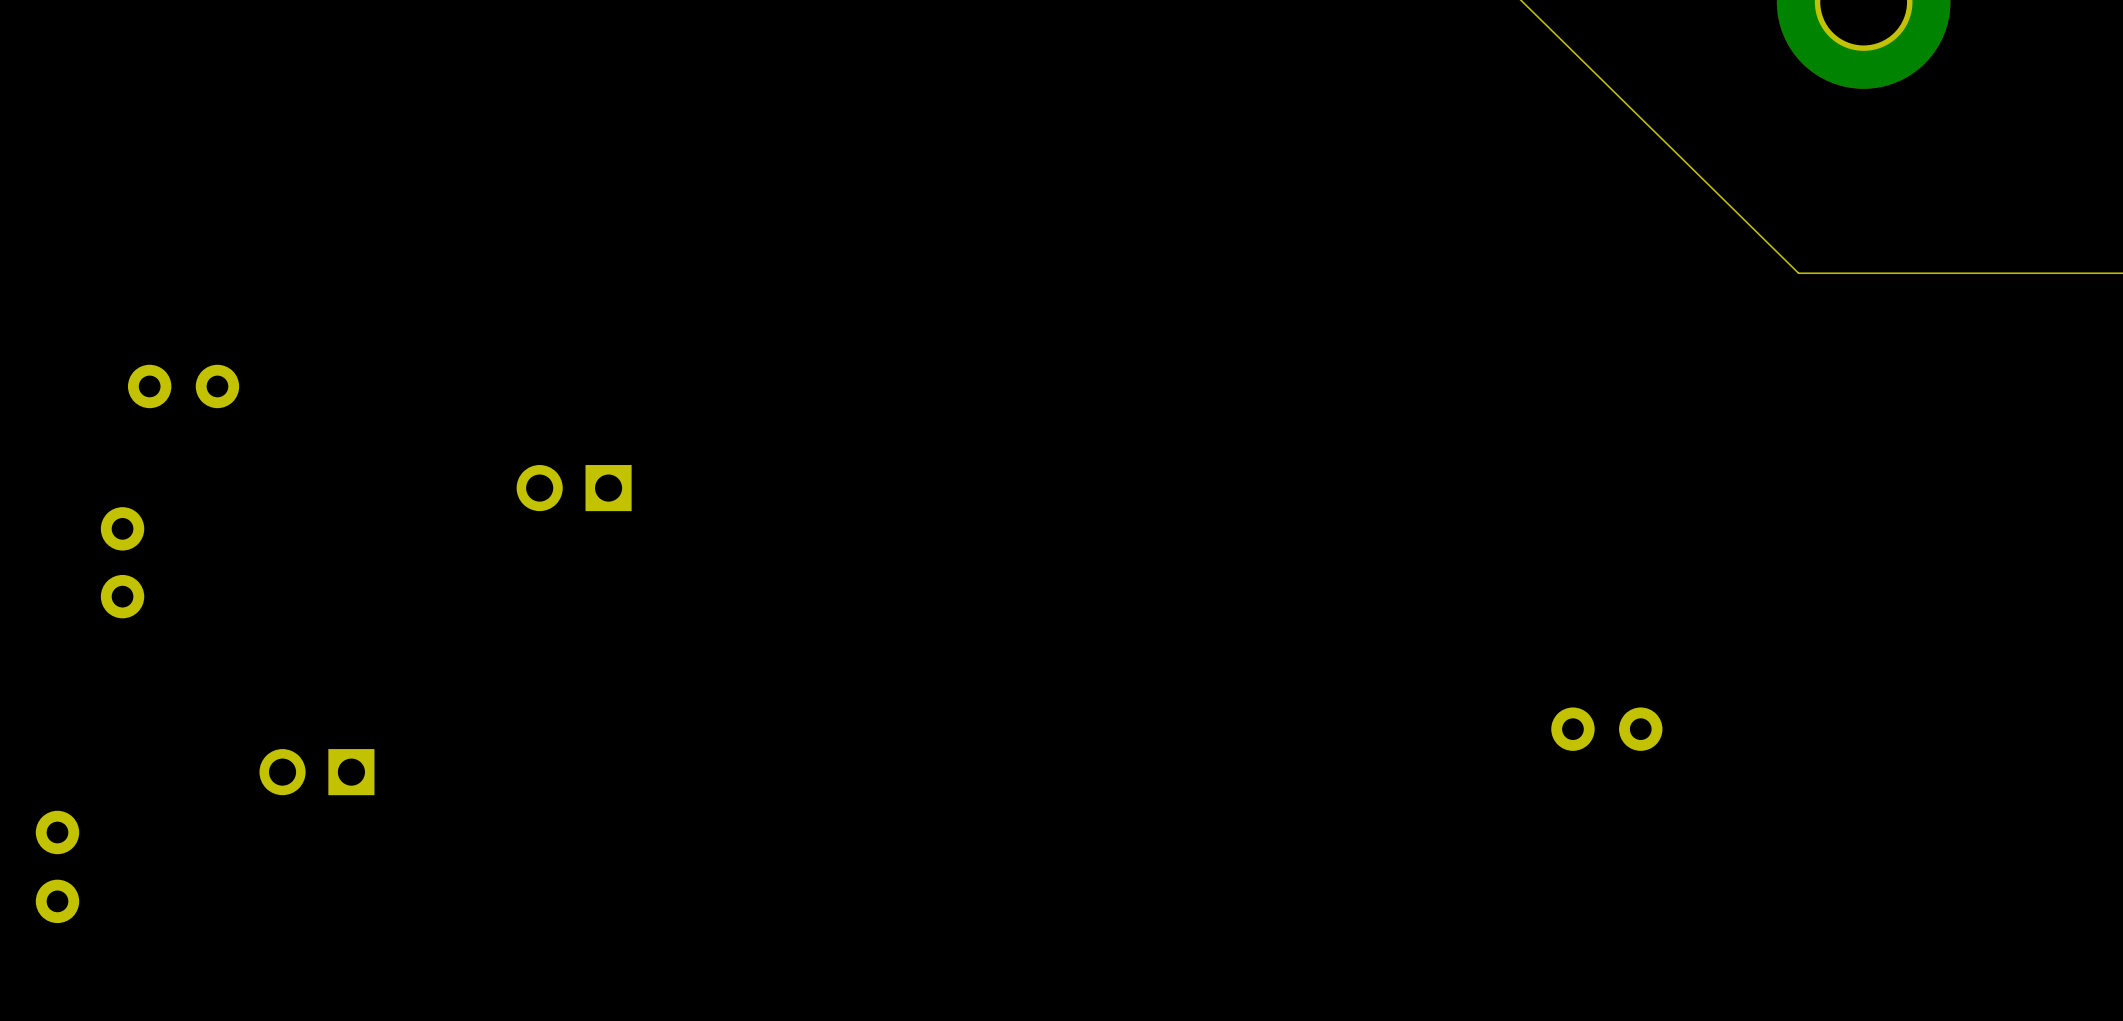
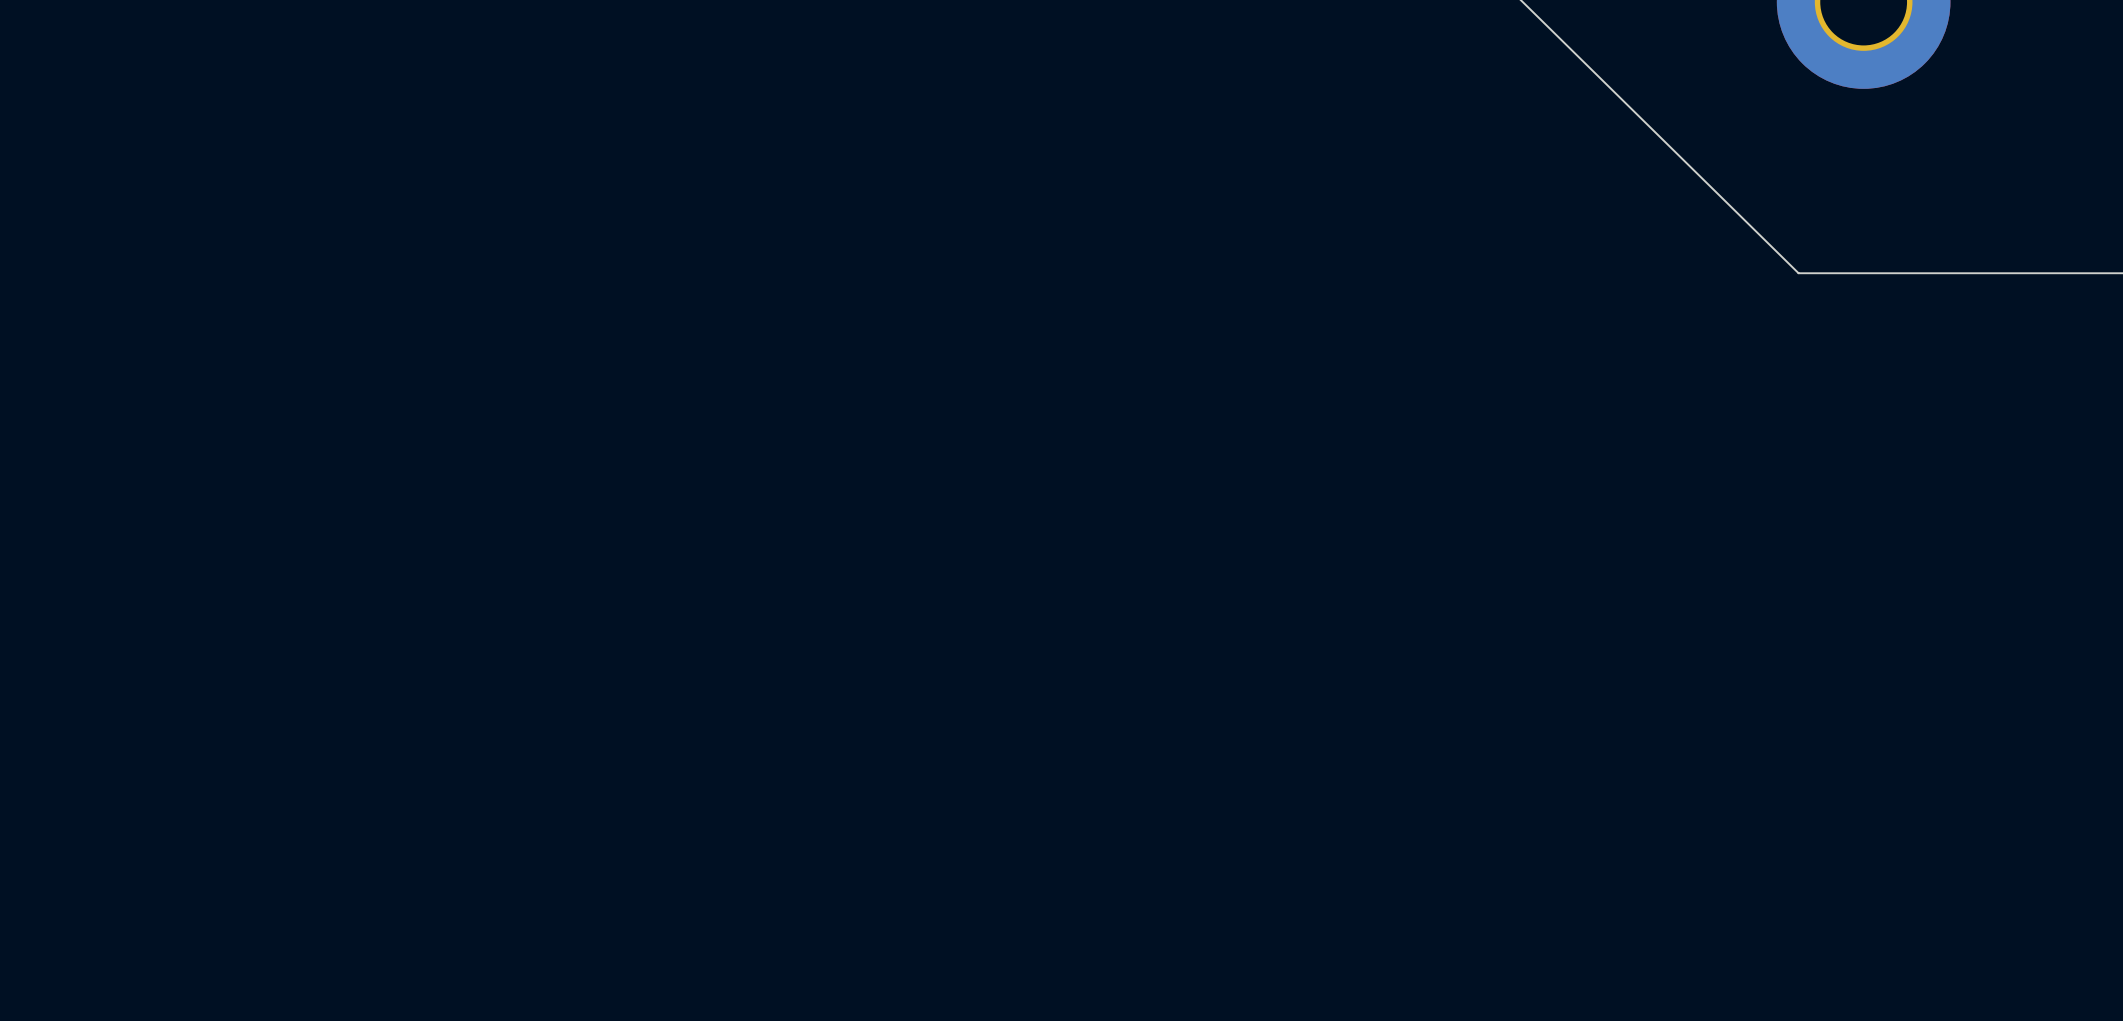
part: (183, 386) -> none
part: (574, 488) -> none
part: (122, 562) -> none
part: (1606, 729) -> none
part: (316, 772) -> none
part: (57, 866) -> none

